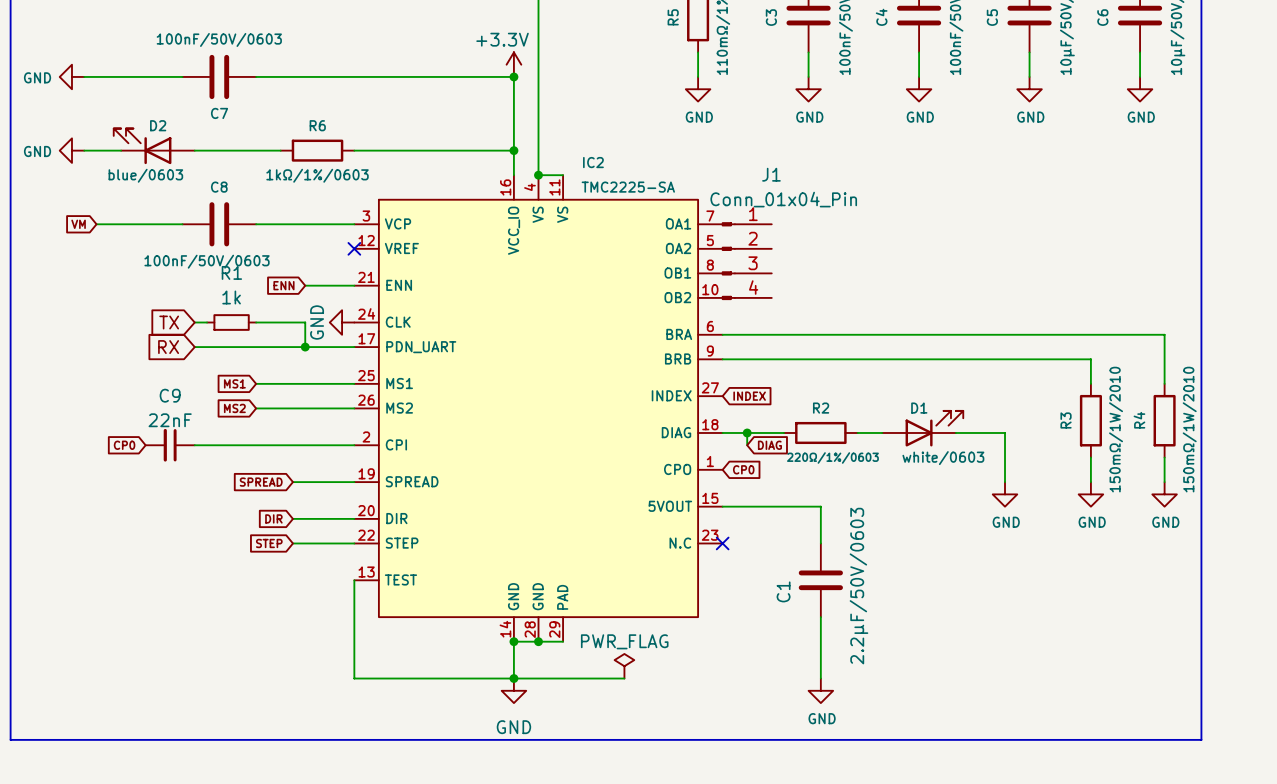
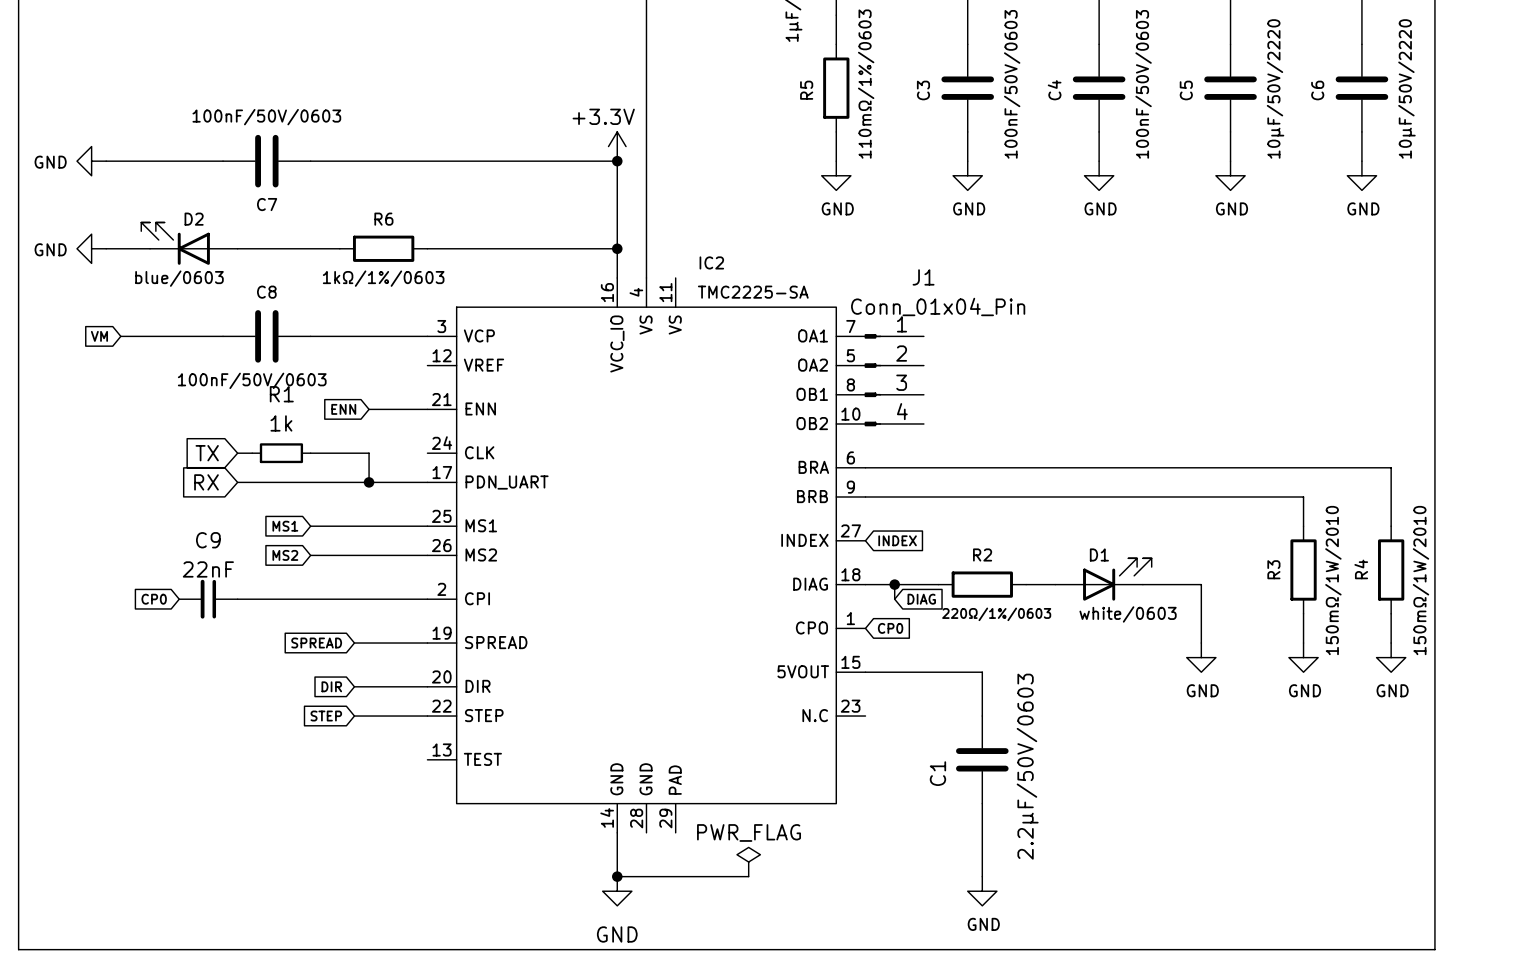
wire: (538, 175) (563, 175) -> none
junction: (538, 175) -> none
no-connect mark: (354, 248) -> none
power symbol: GND (342, 322) -> none
no-connect mark: (722, 543) -> none
wire: (354, 580) (354, 678) (513, 678) -> none
wire: (513, 641) (563, 641) -> none
junction: (513, 641) -> none
junction: (538, 641) -> none

